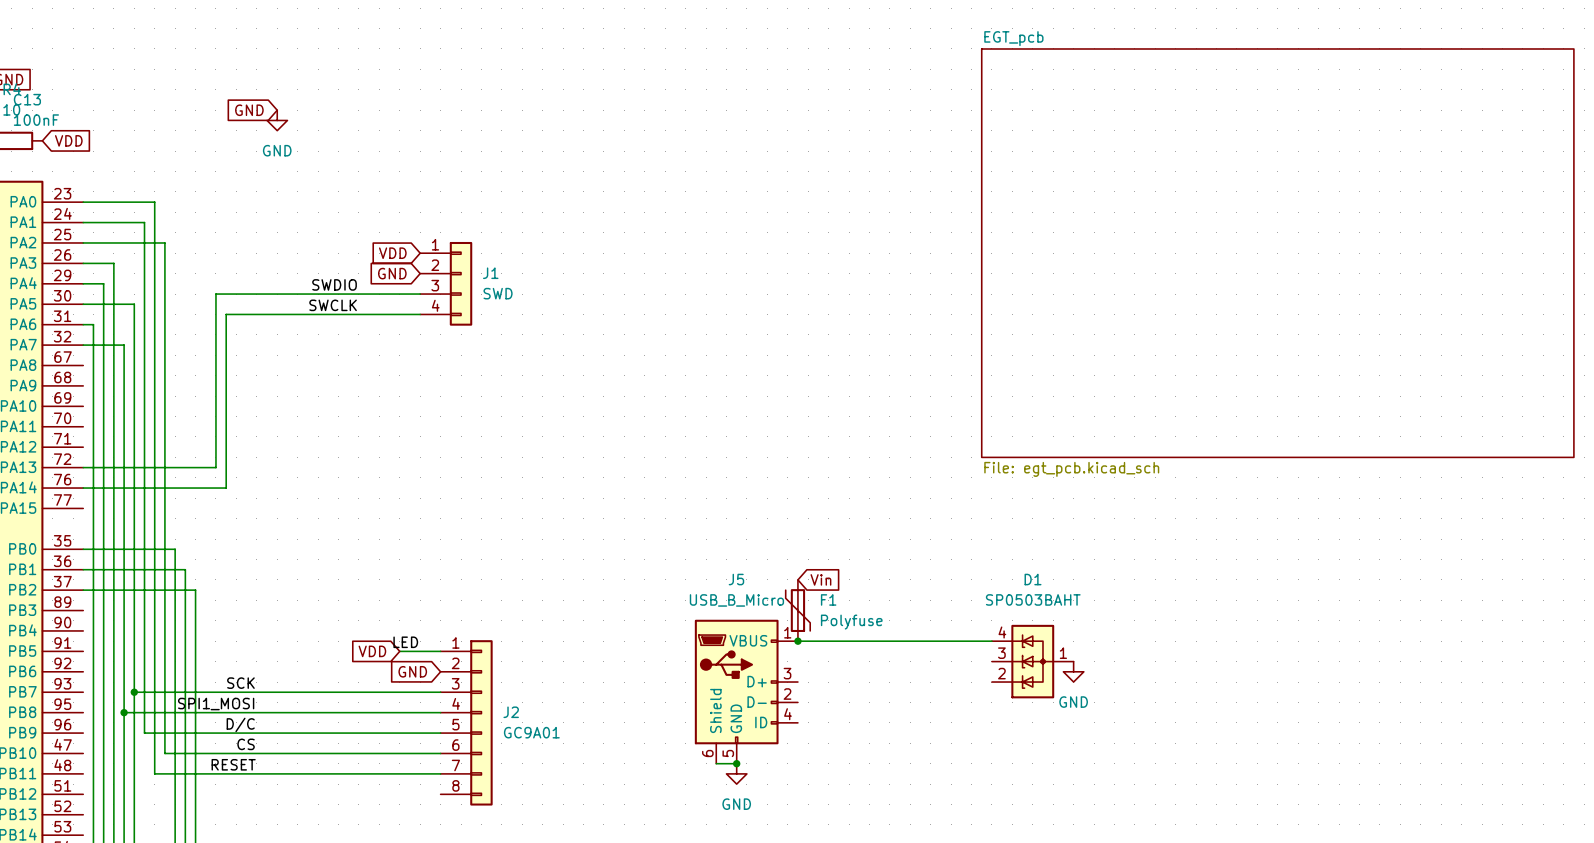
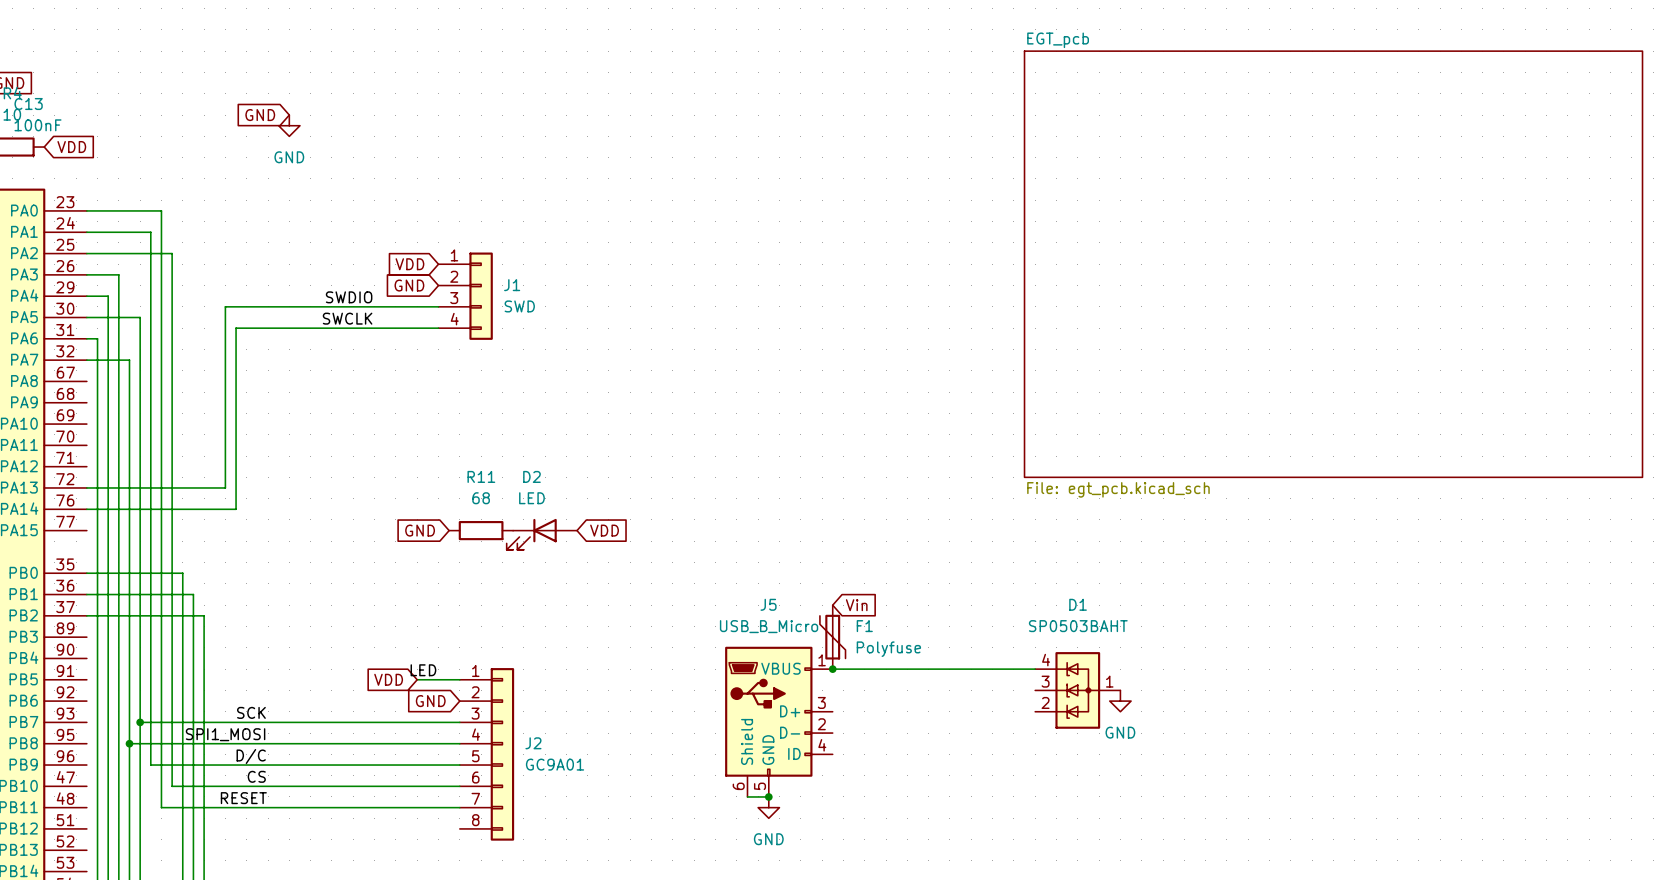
global label: none -> GND (420, 530)
R11: none -> 68 (481, 530)
global label: none -> VDD (604, 530)
D2: none -> LED (541, 534)

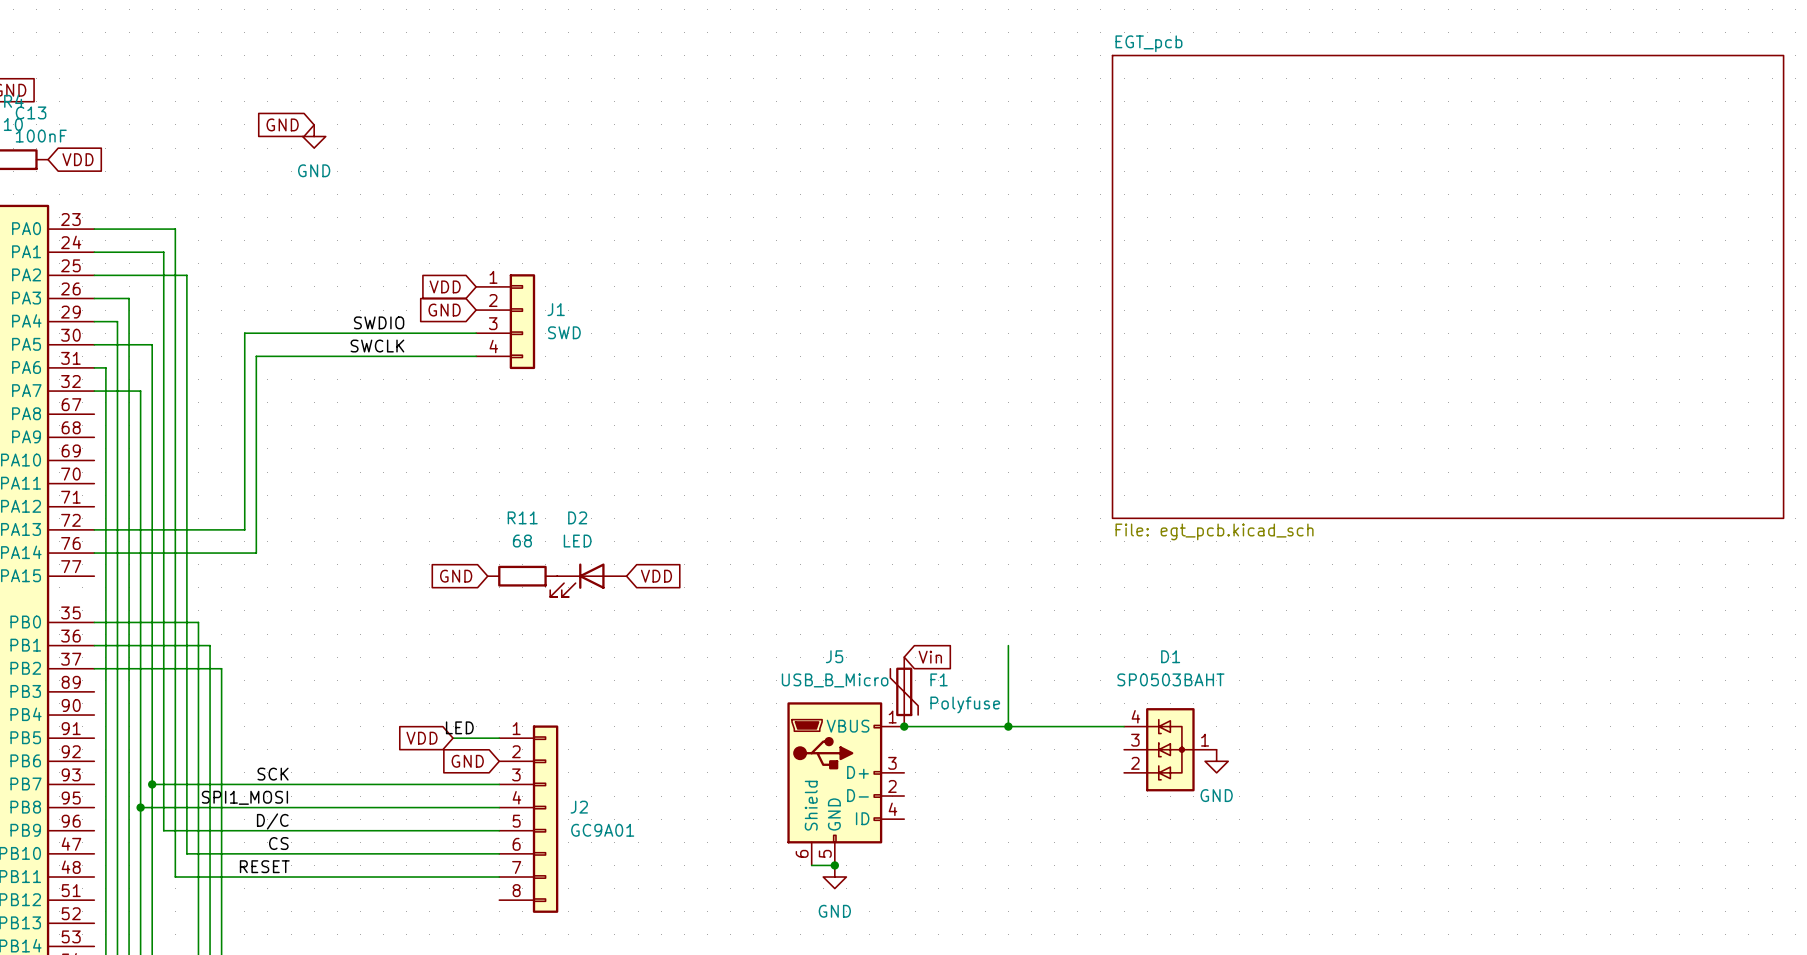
wire: none -> (1008, 645) (1008, 726)
junction: none -> (1008, 726)

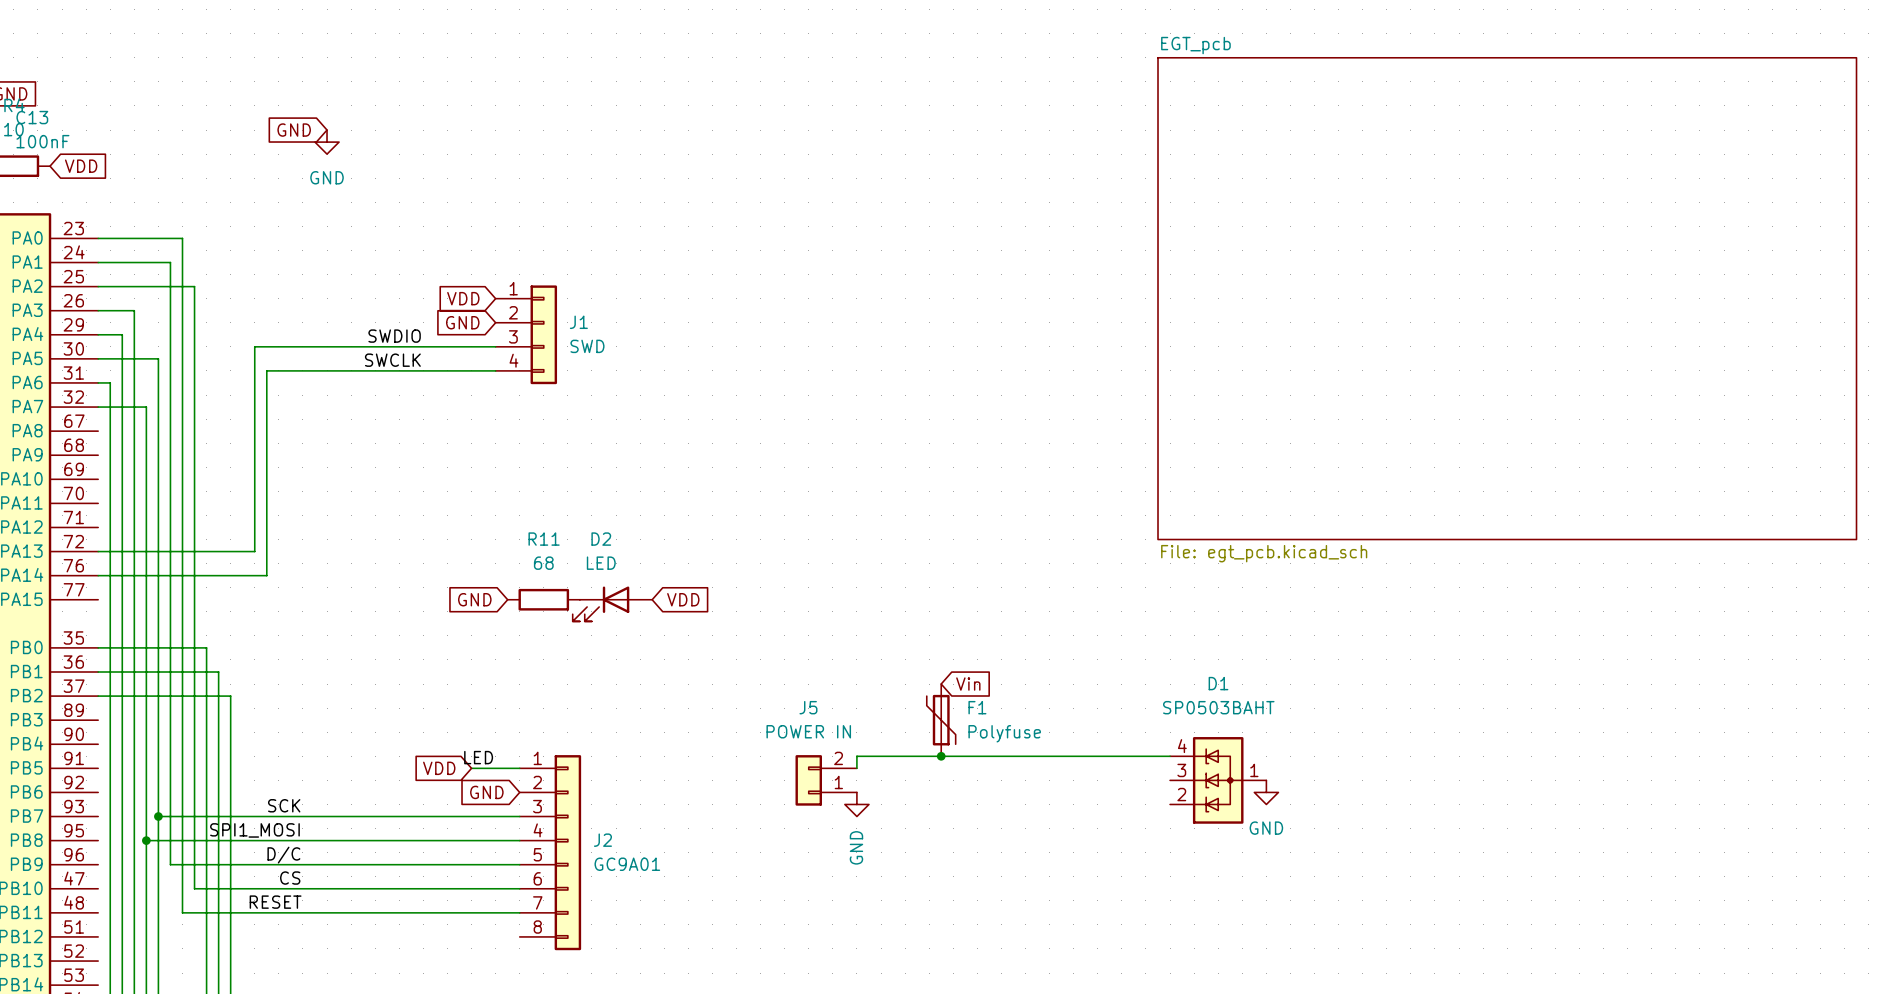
wire: (1008, 645) (1008, 726) -> none
J5 name position: J5 (834, 656) -> J5 (808, 707)
J5 value: USB_B_Micro (835, 680) -> POWER IN (808, 731)
J5 symbol: [787, 702, 905, 866] -> [795, 755, 857, 806]
junction: (1008, 726) -> none
wire: (811, 865) (834, 865) -> none
junction: (834, 865) -> none
power symbol position: GND (834, 877) -> GND (856, 804)
power symbol text rotation: 0° (834, 911) -> 90° counterclockwise (856, 847)

